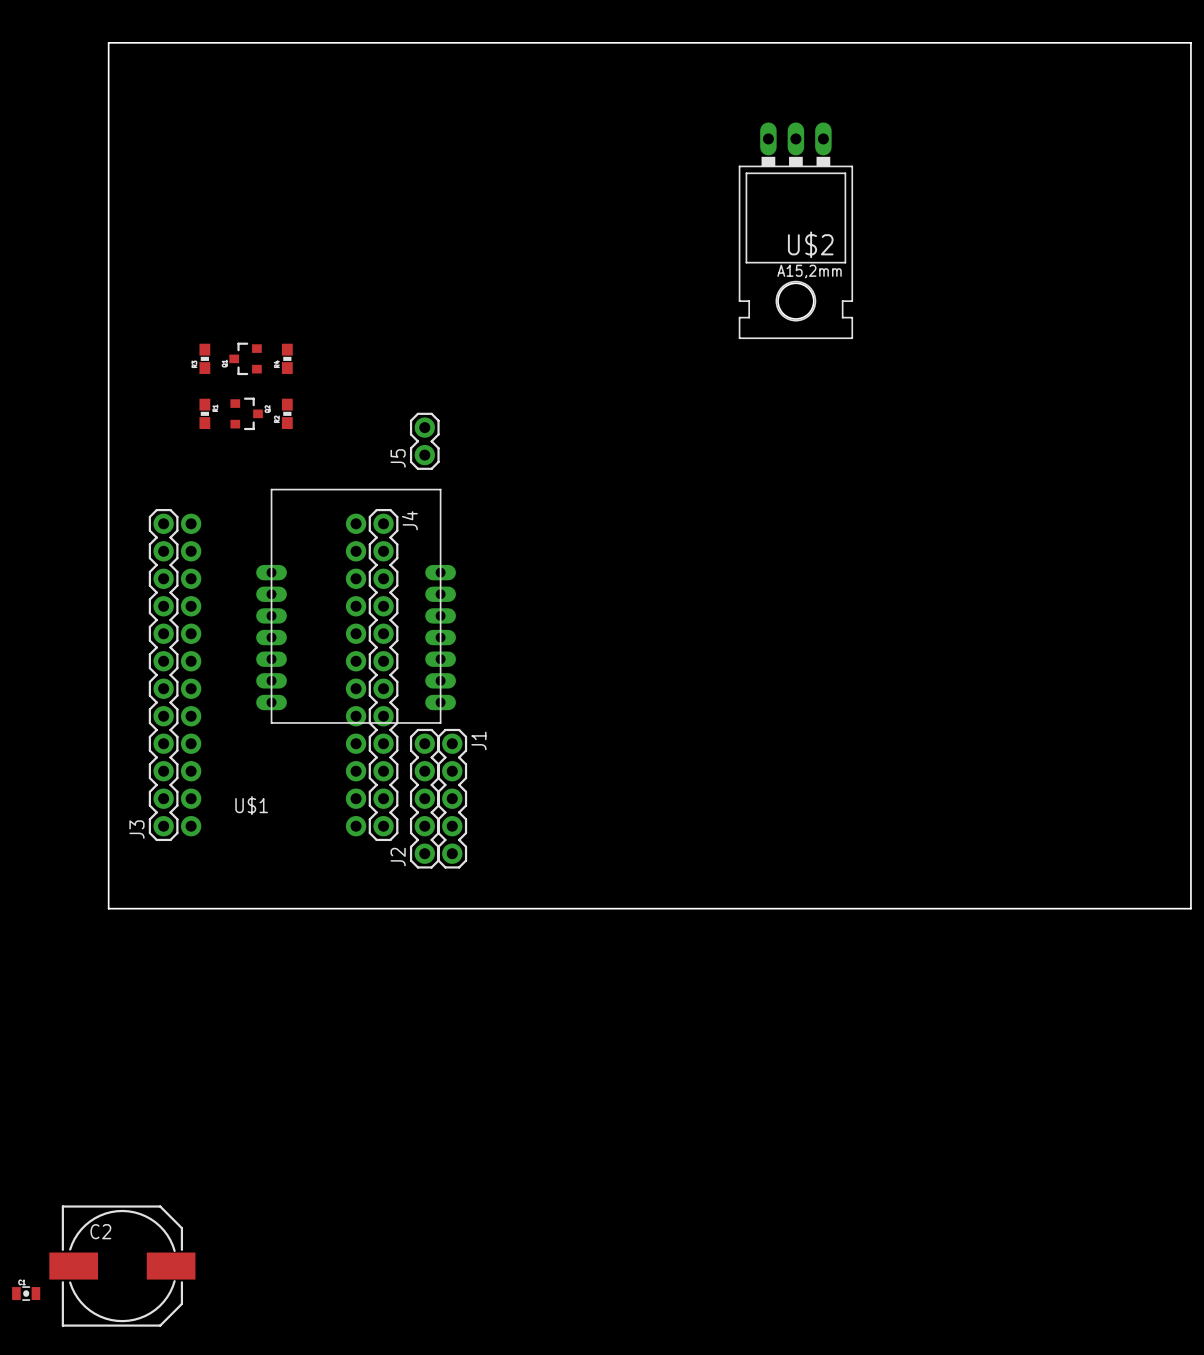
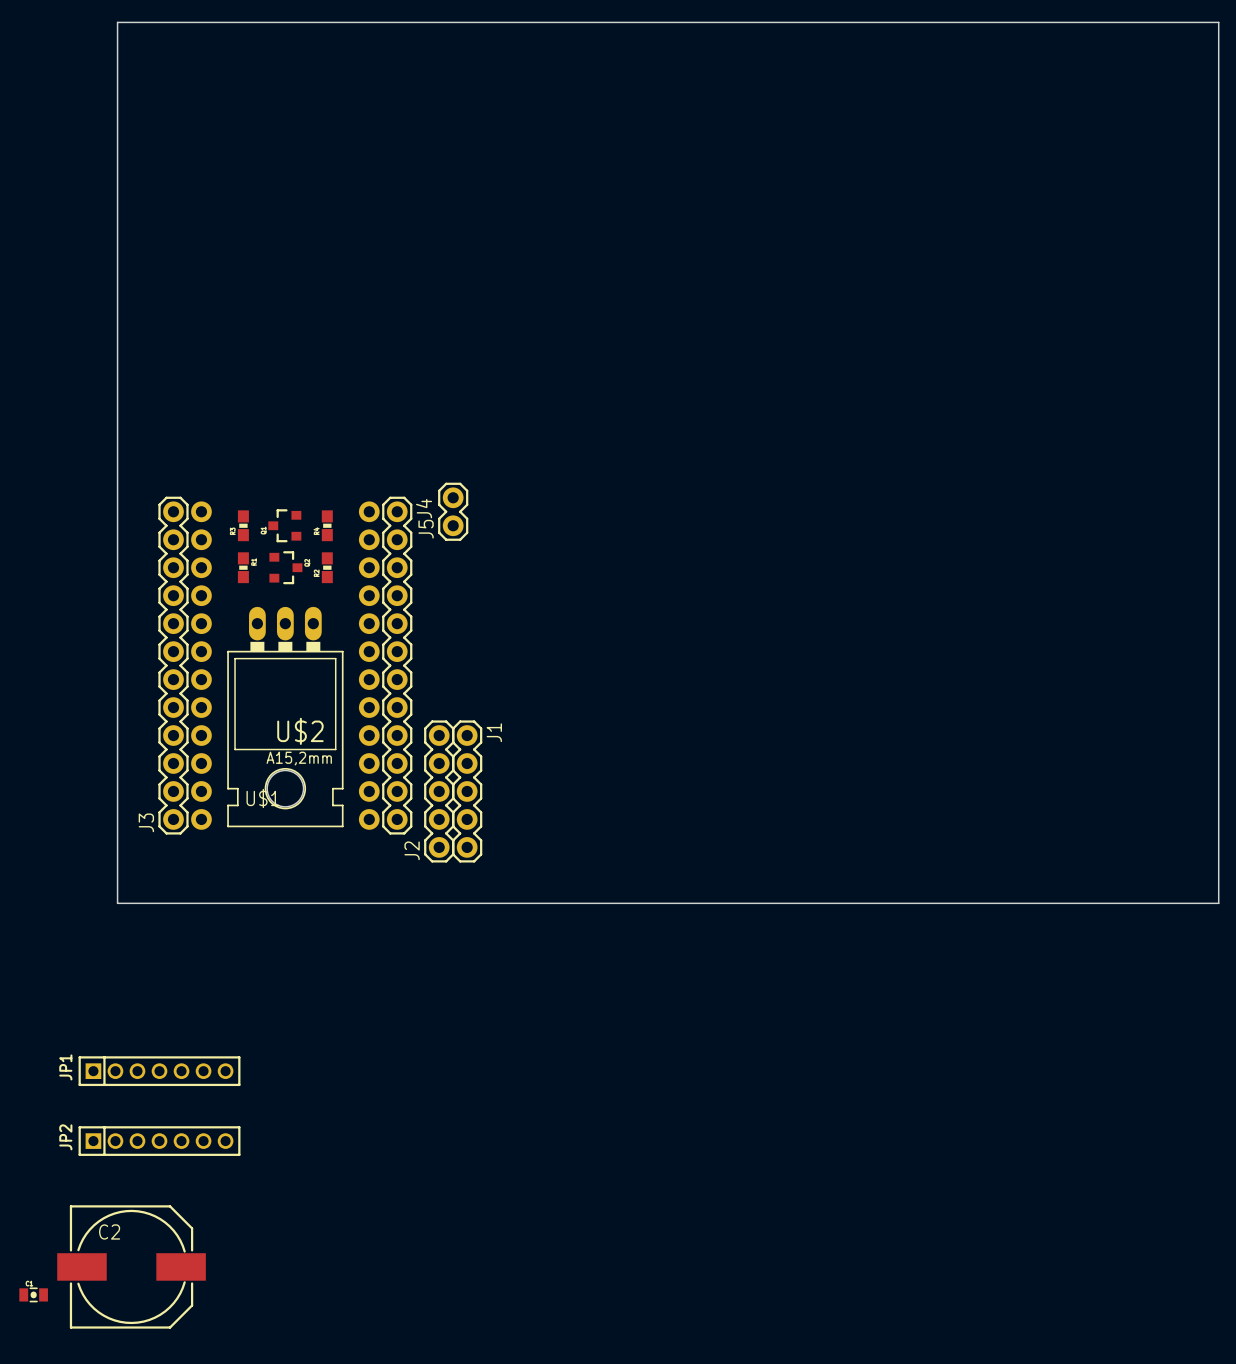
U$2 position: (795, 230) -> (285, 717)
part position: (204, 358) -> (243, 525)
part position: (245, 358) -> (284, 525)
part position: (287, 358) -> (327, 525)
part position: (204, 413) -> (243, 567)
part position: (246, 413) -> (285, 567)
part position: (287, 413) -> (327, 567)
J5 position: (424, 441) -> (453, 511)
part: (356, 606) -> none
JP1: none -> (159, 1071)
JP2: none -> (159, 1141)

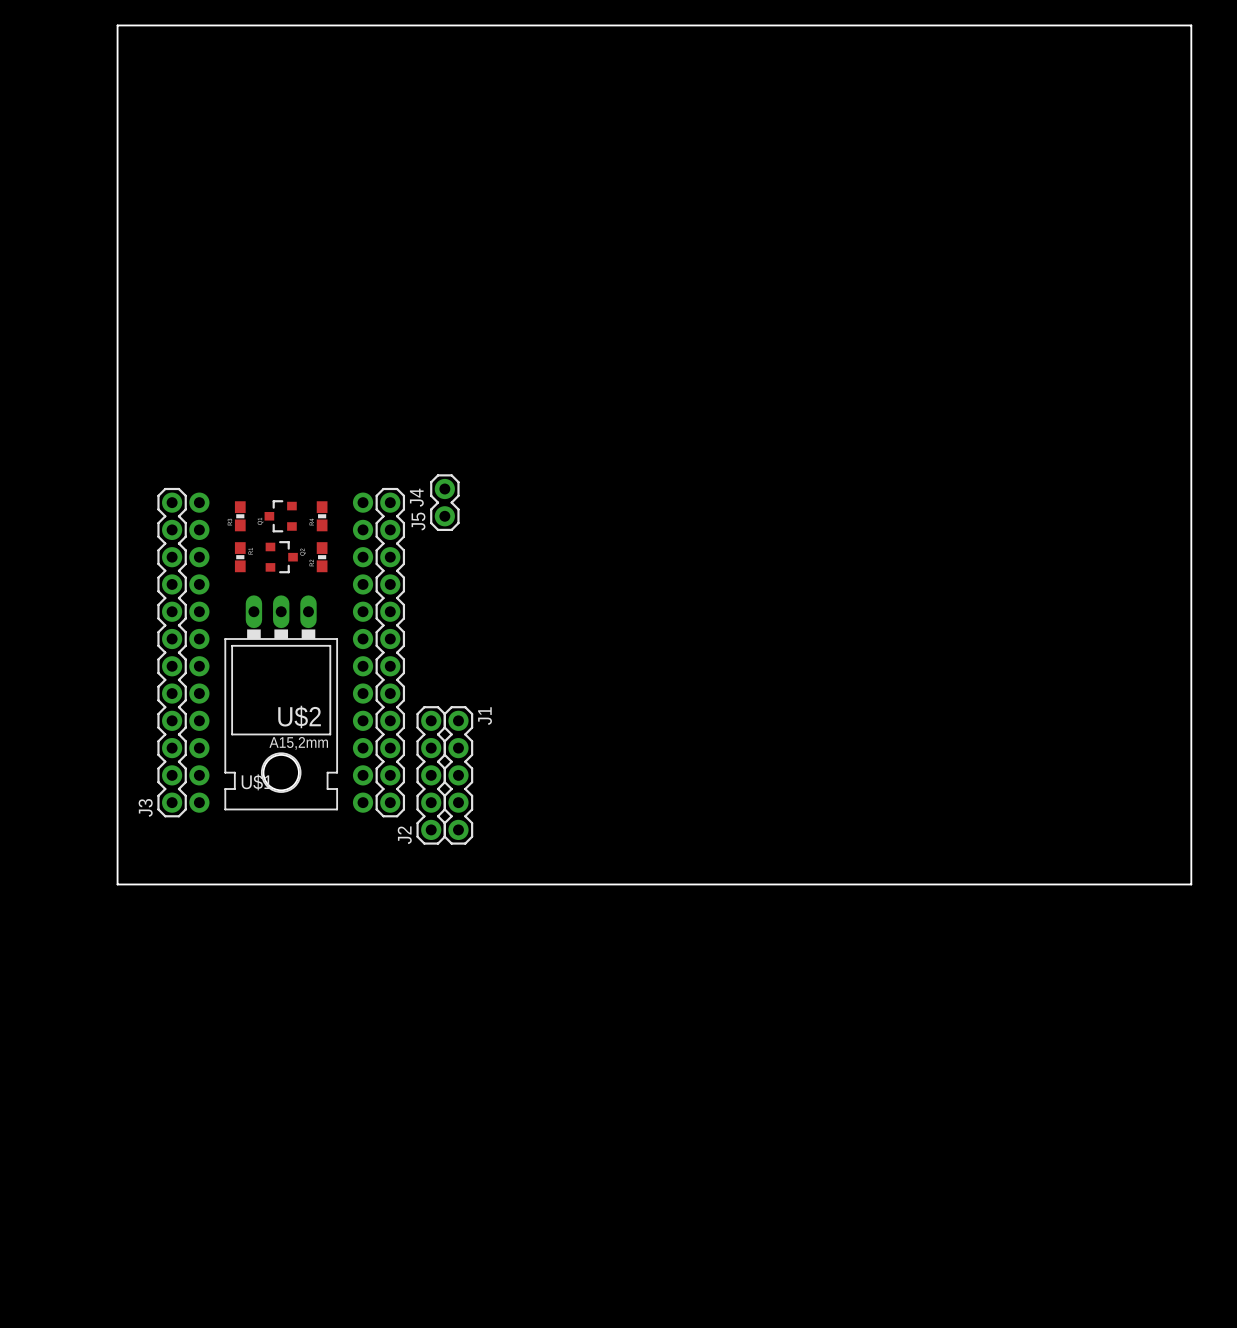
JP1: (159, 1071) -> none
JP2: (159, 1141) -> none
C2: (131, 1266) -> none
part: (33, 1294) -> none

